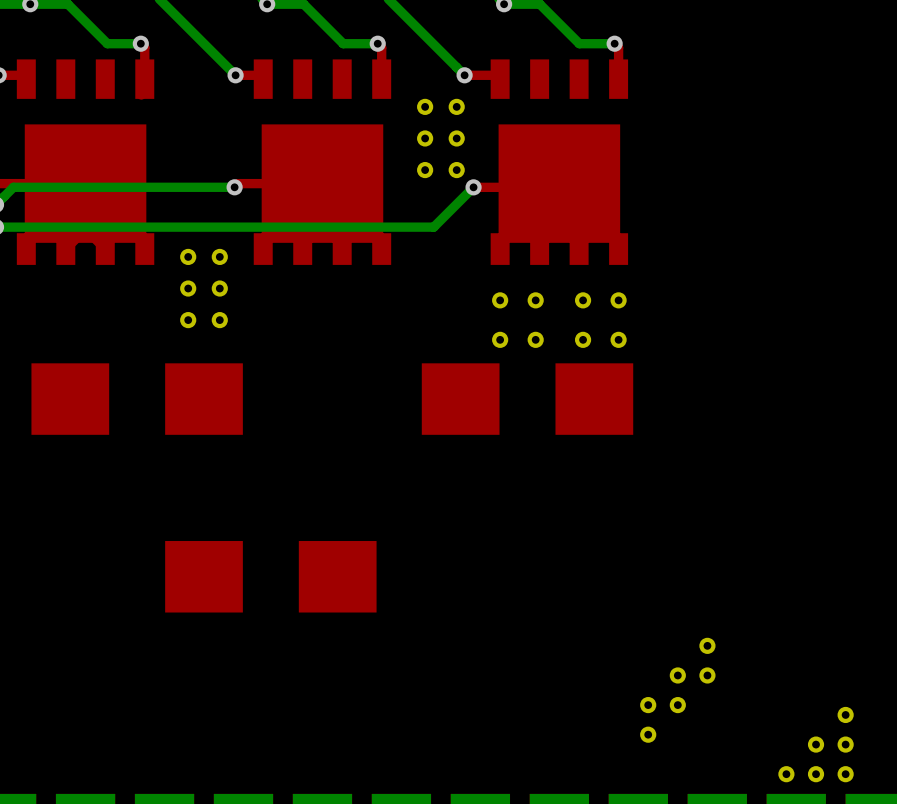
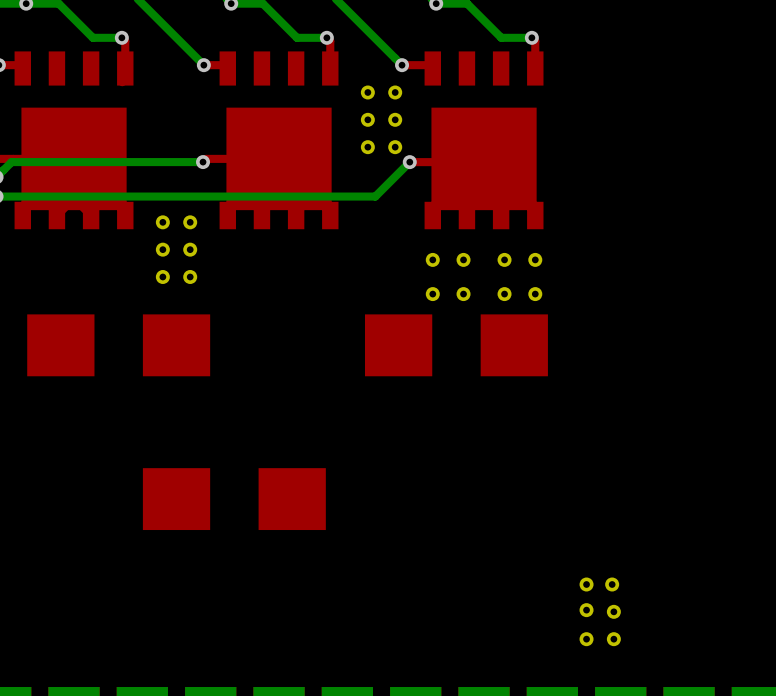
part: (707, 645) -> none
part: (648, 705) -> none
part: none -> (613, 611)
part: (845, 714) -> none
part: (648, 734) -> none
part: none -> (586, 639)
part: none -> (613, 639)
part: (816, 744) -> none
part: (845, 744) -> none
part: (786, 774) -> none
part: (816, 774) -> none
part: (845, 774) -> none

